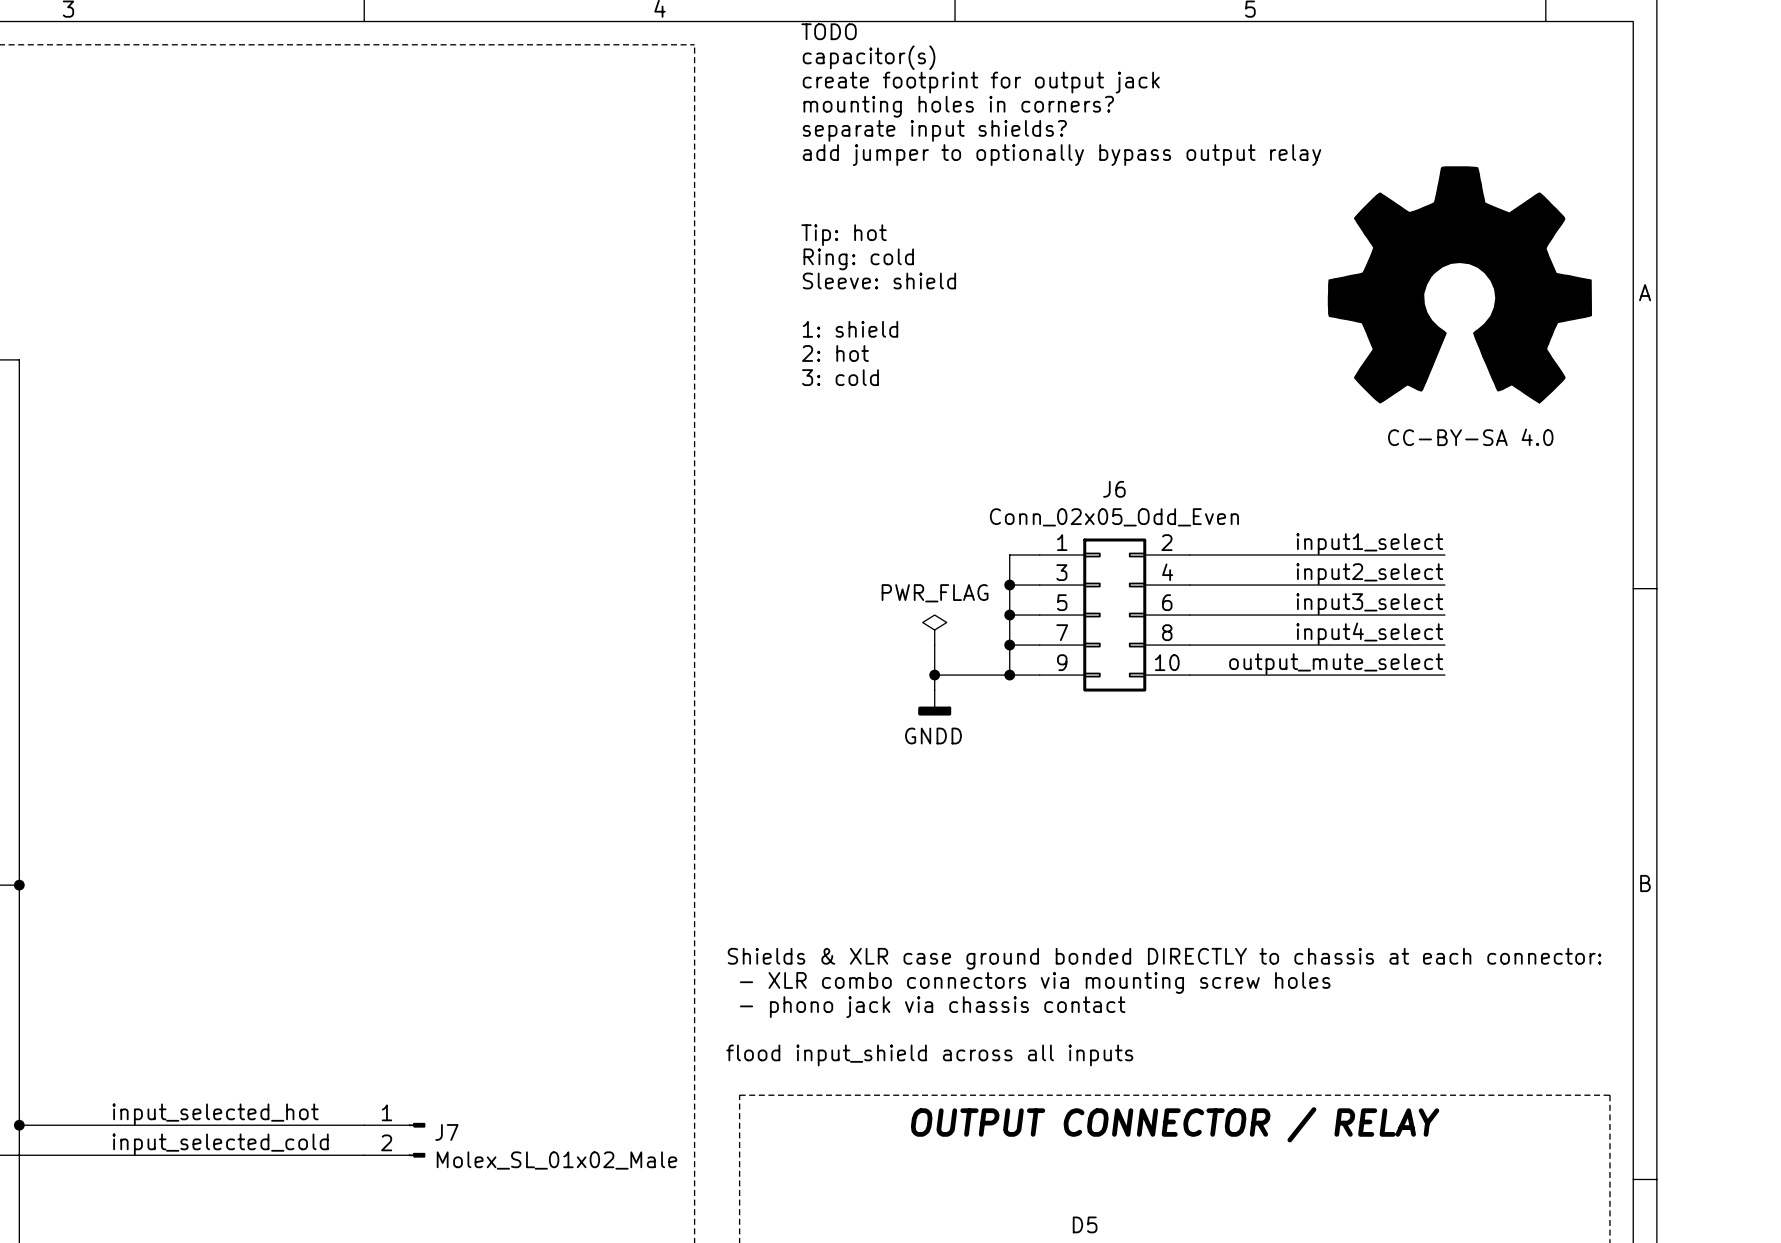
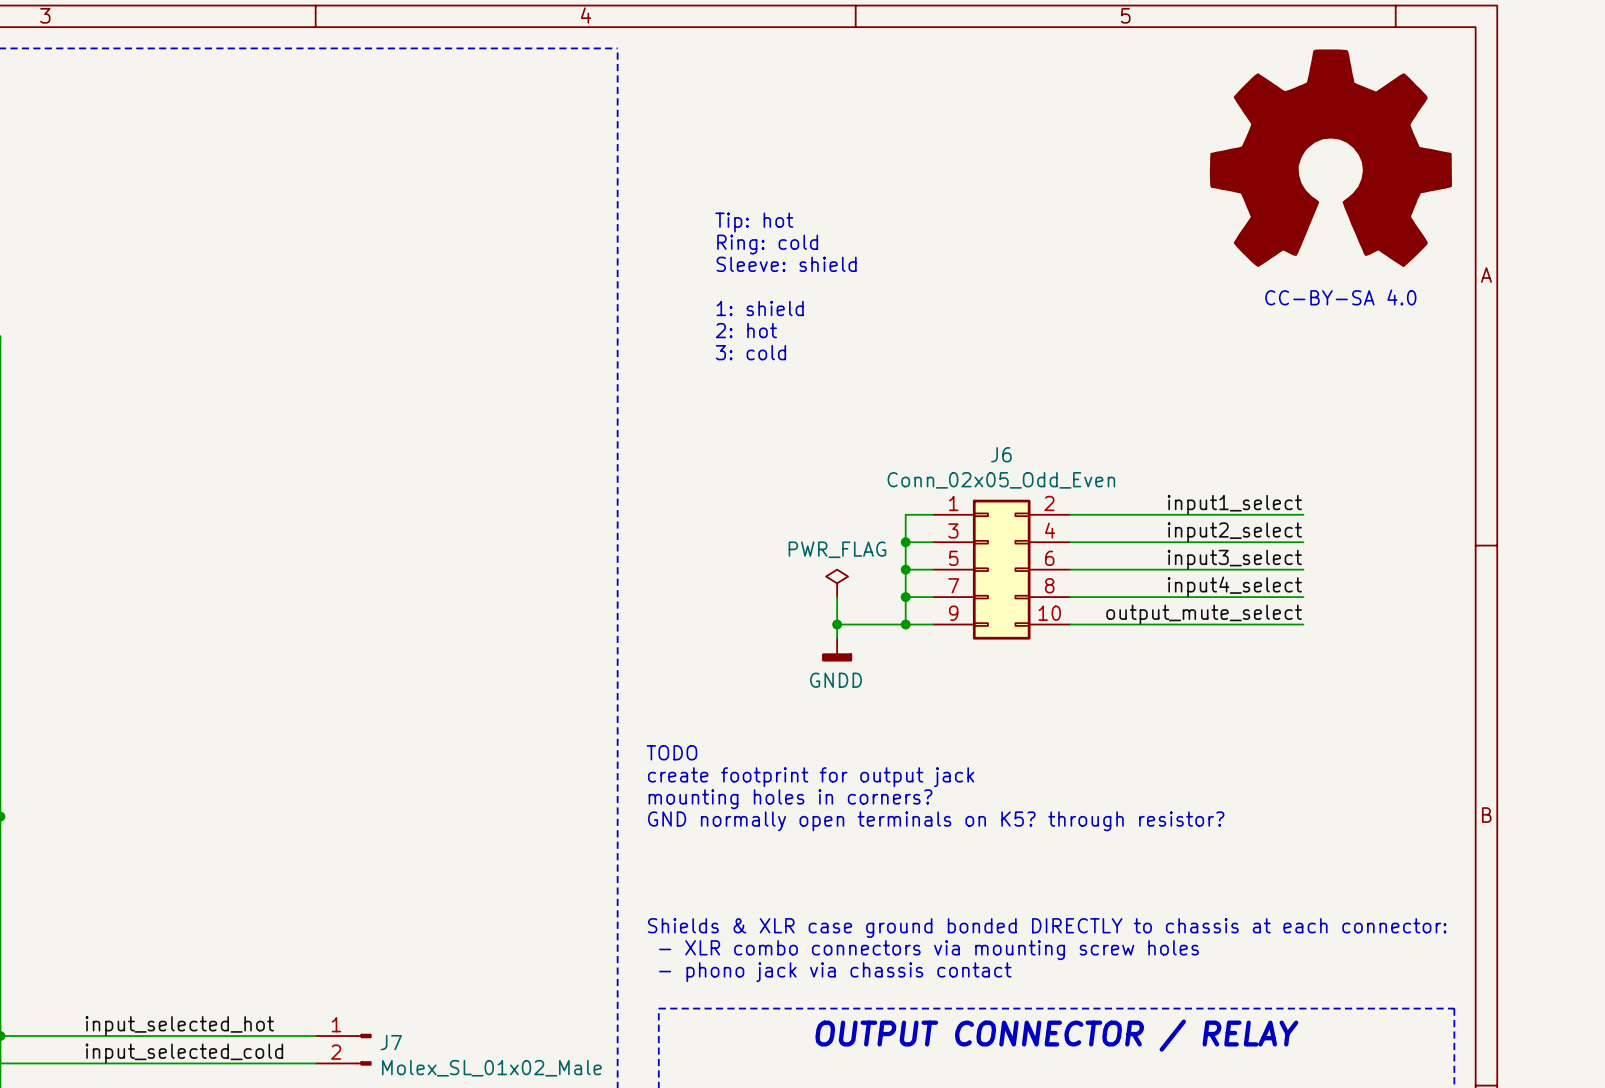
text: TODO (829, 31) -> none
text: capacitor(s) (869, 57) -> none
text: create footprint for output jack (981, 82) -> none
text: mounting holes in corners? (958, 106) -> none
text: separate input shields? (934, 130) -> none
text: add jumper to optionally bypass output relay (1062, 155) -> none
power symbol position: (1459, 284) -> (1330, 158)
text position: CC-BY-SA 4.0 (1470, 437) -> CC-BY-SA 4.0 (1340, 297)
text: none -> TODO (671, 752)
text: none -> create footprint for output jack (811, 777)
text: none -> mounting holes in corners? (790, 799)
text: none -> GND normally open terminals on K5? through resistor? (936, 821)
text: Shields & XLR case ground bonded DIRECTLY to chassis at each connector: (1164, 958) -> none
text position: - XLR combo connectors via mounting screw holes (1035, 982) -> - XLR combo connectors via mounting screw holes (928, 950)
text: - phono jack via chassis contact (932, 1007) -> Shields & XLR case ground bonded DIRECTLY to chassis at each connector: (1047, 928)
text: flood input_shield across all inputs (929, 1055) -> - phono jack via chassis contact (835, 972)

